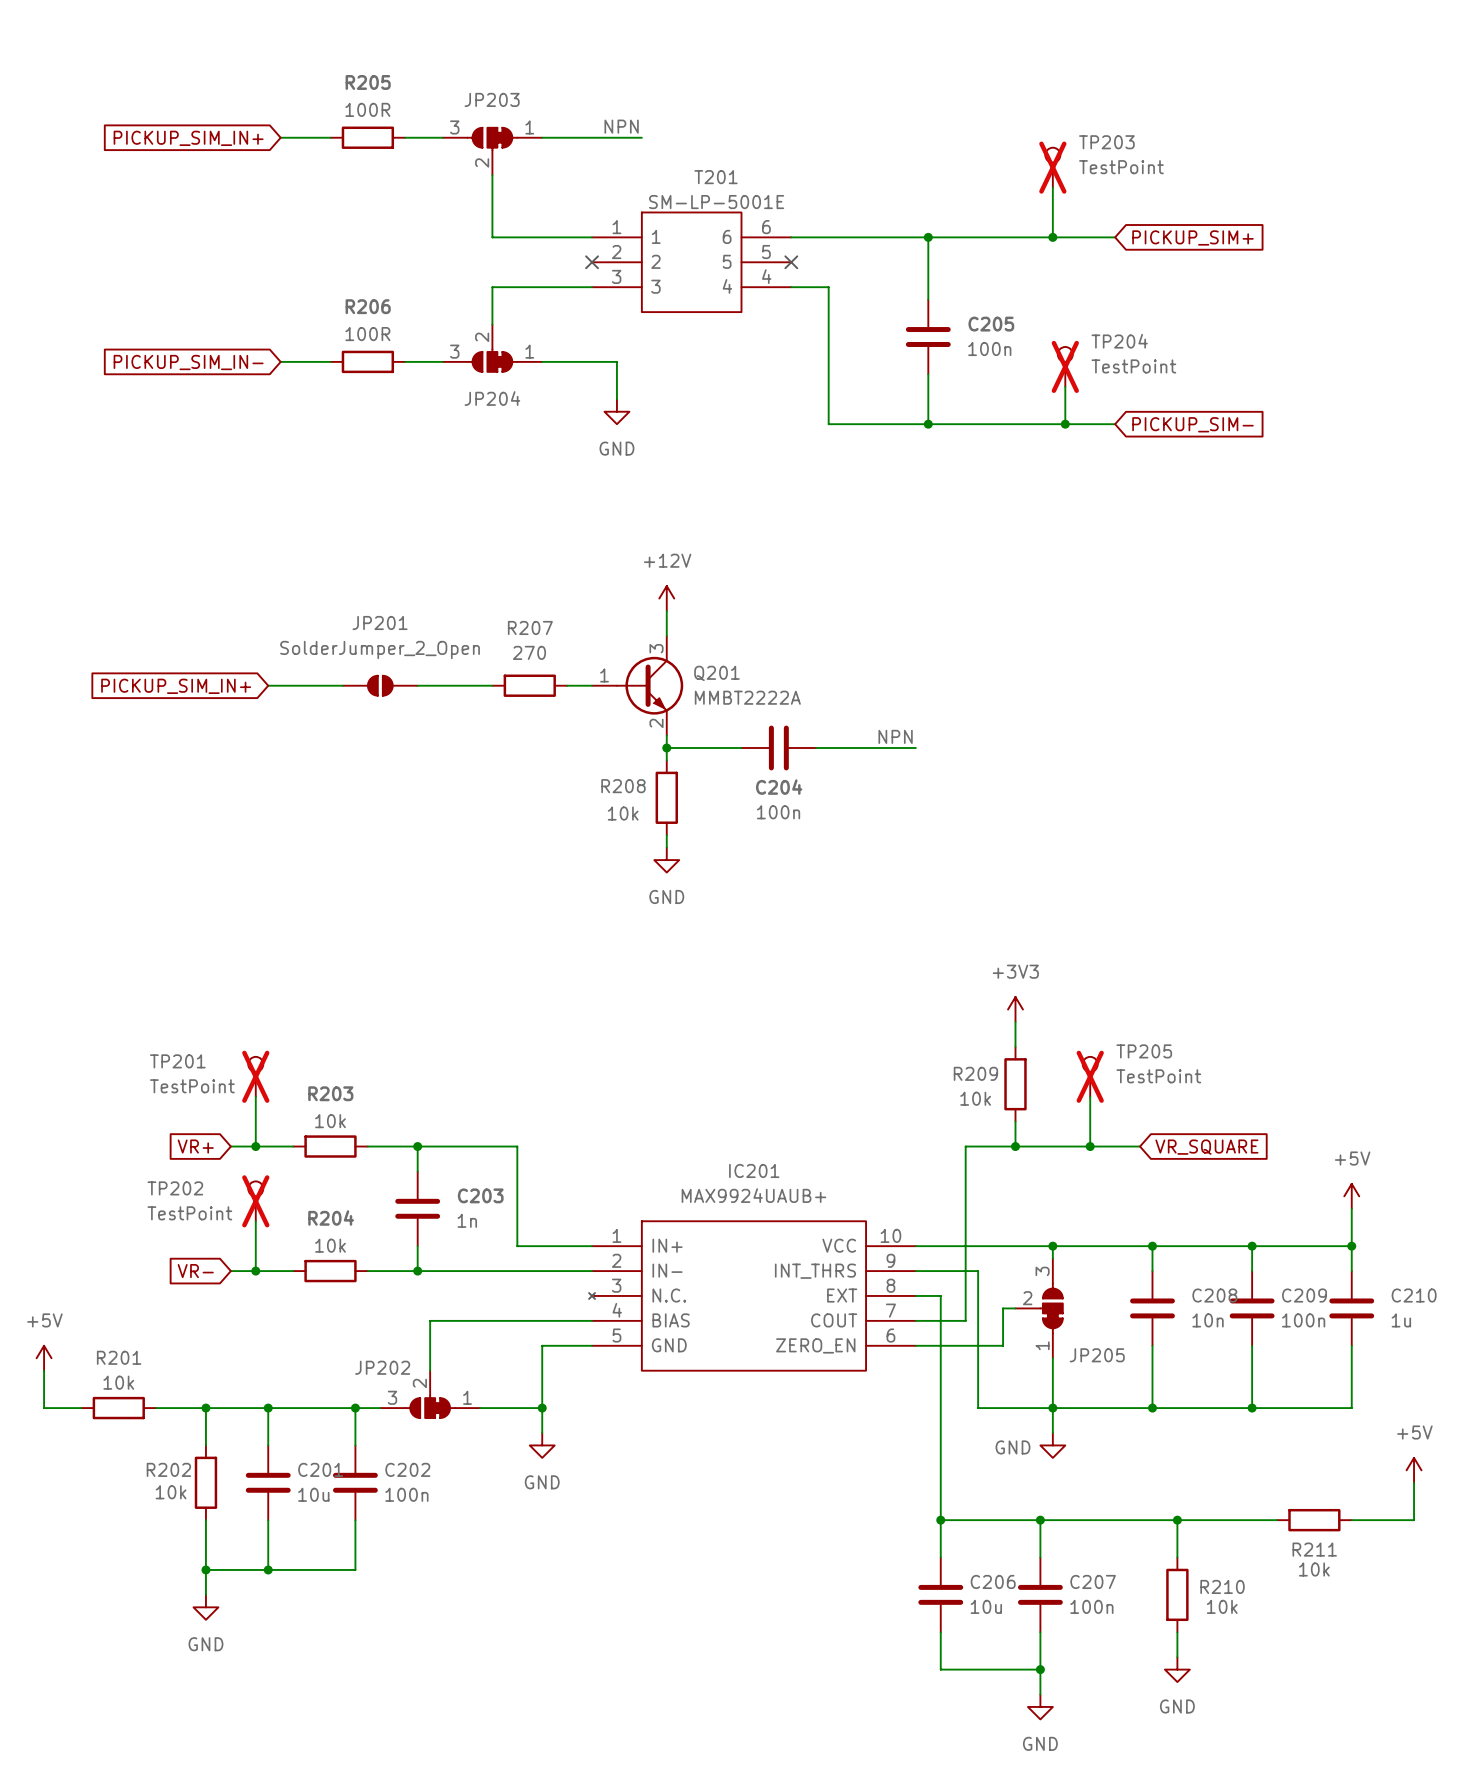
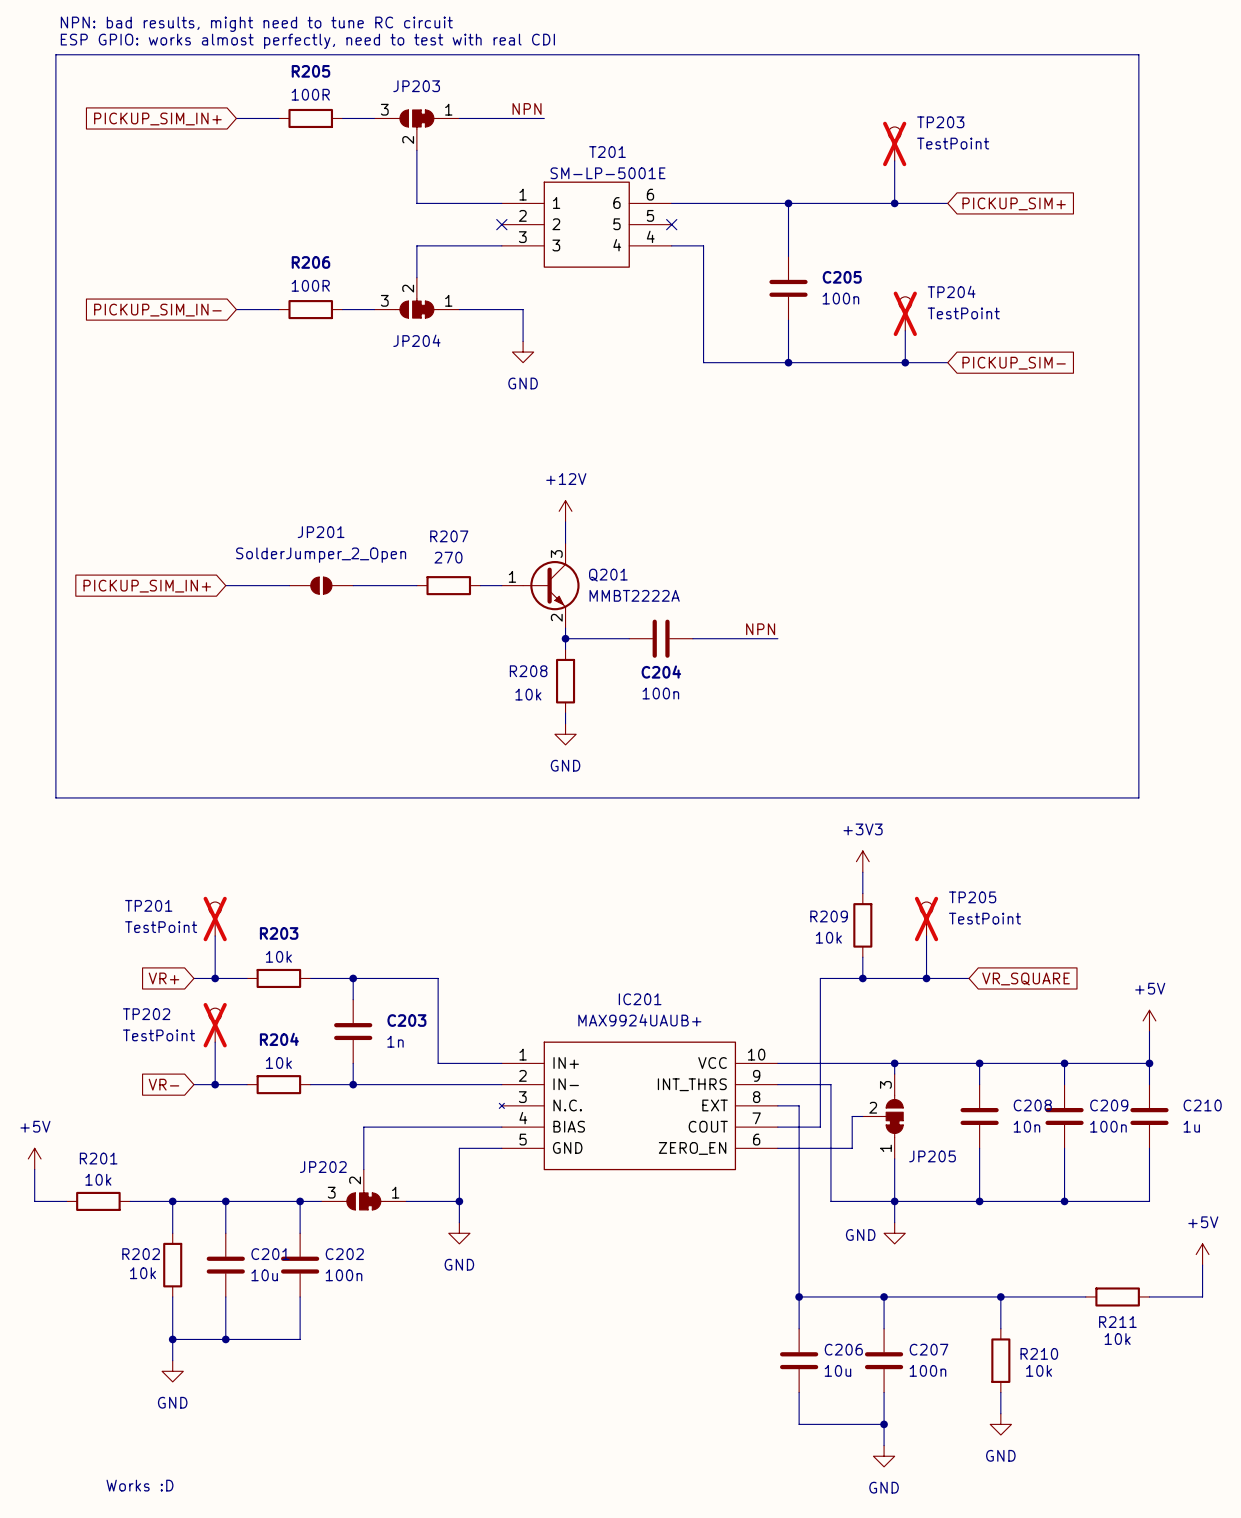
text: none -> NPN: bad results, might need to tune RC circuit (256, 24)
text: none -> ESP GPIO: works almost perfectly, need to test with real CDI (307, 41)
line: none -> (55, 54) (1138, 54) (1138, 797) (55, 797) (55, 54)
text: none -> Works :D (139, 1485)

